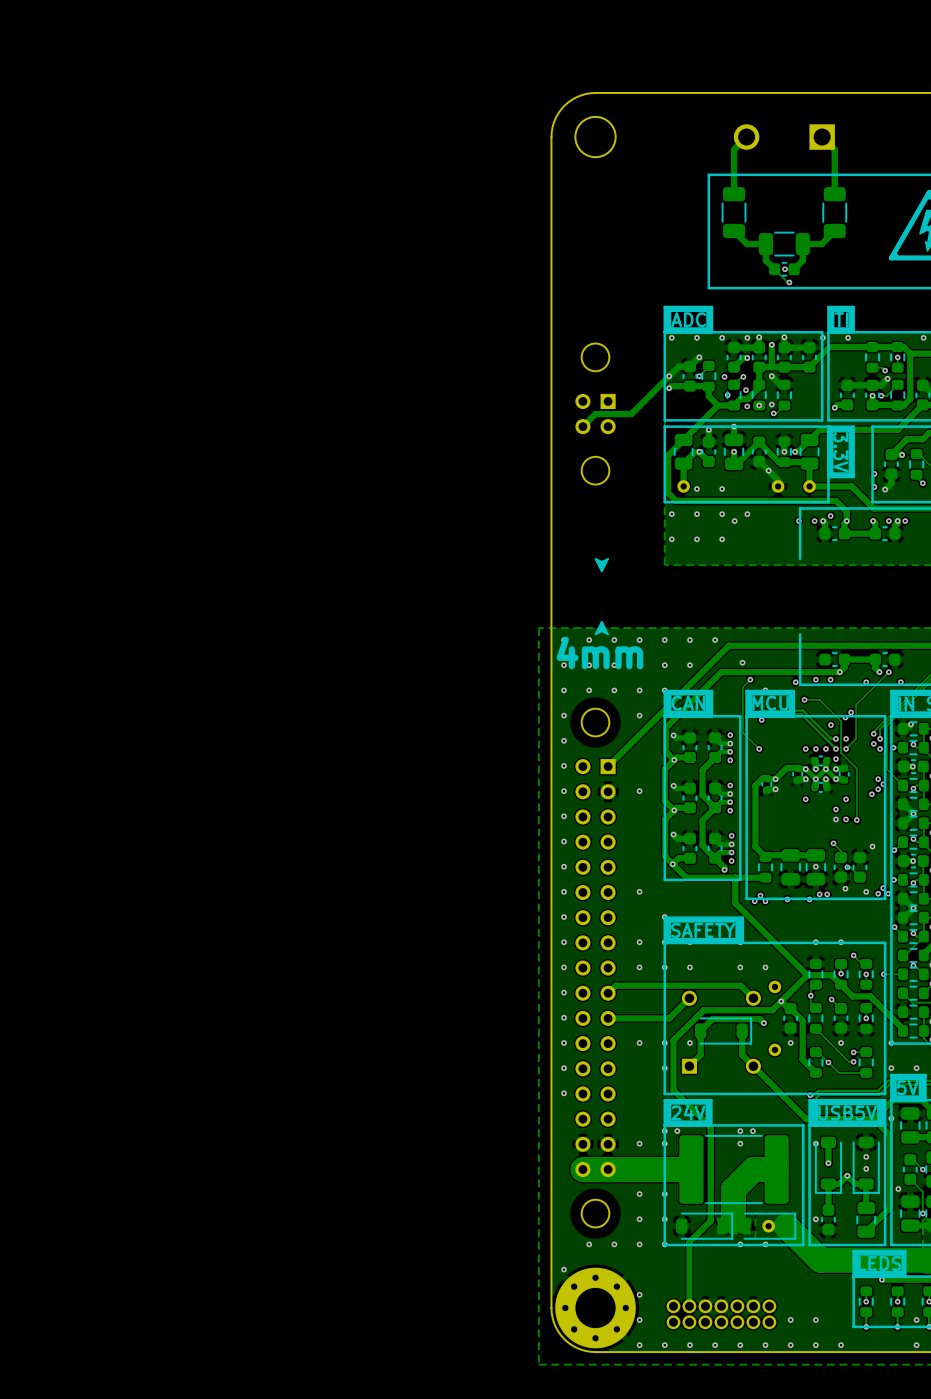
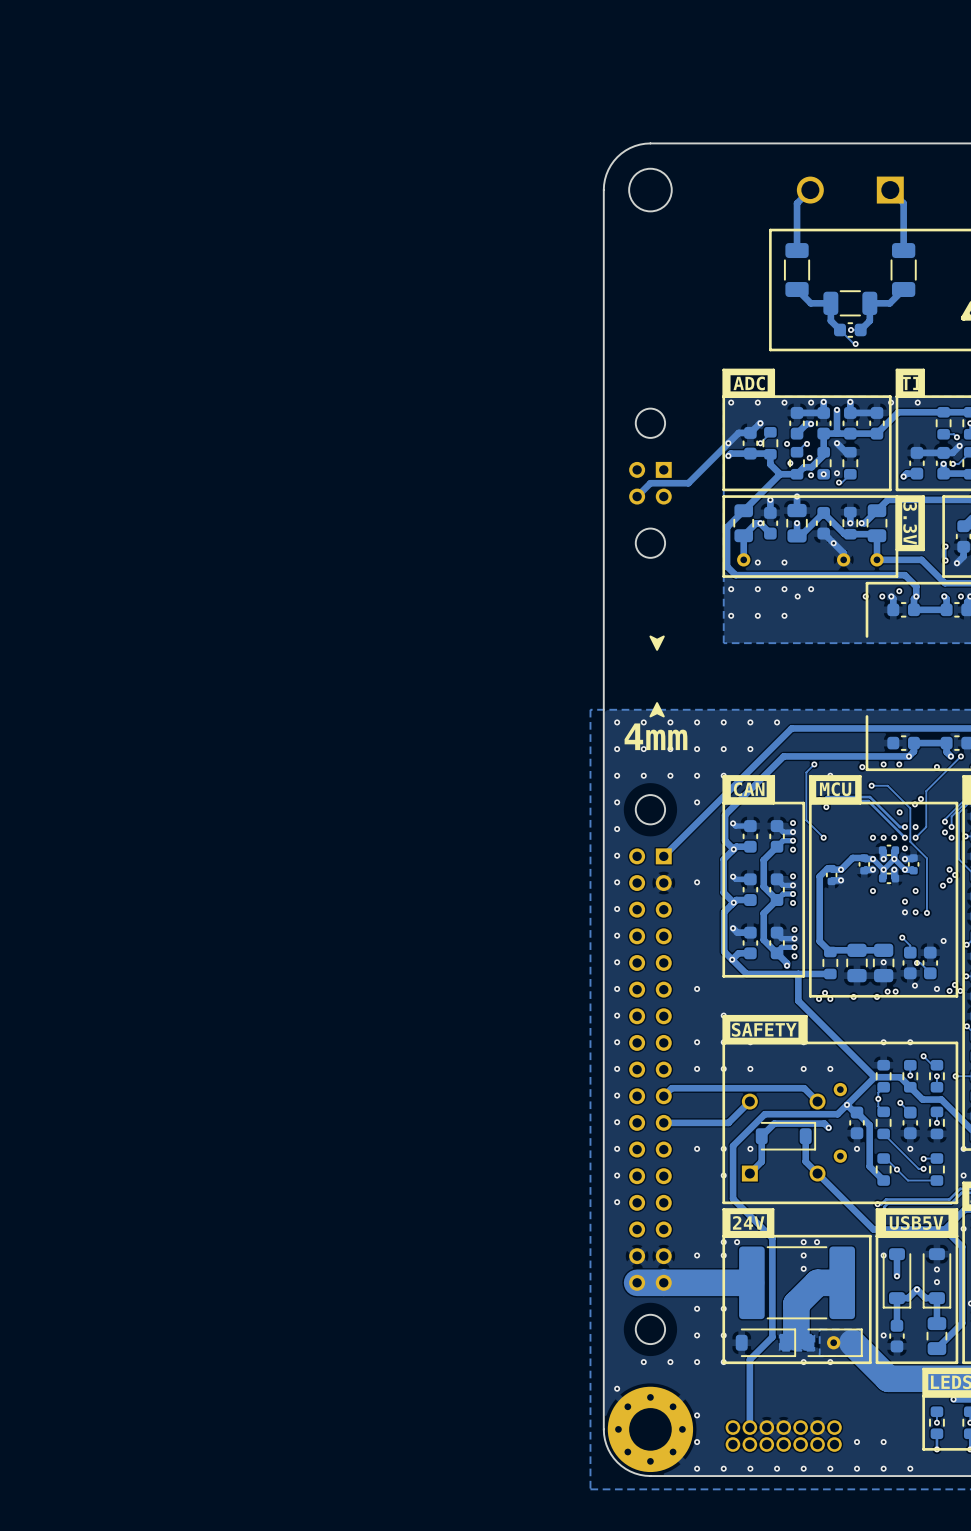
via: (742, 662) -> none
via: none -> (803, 1268)

